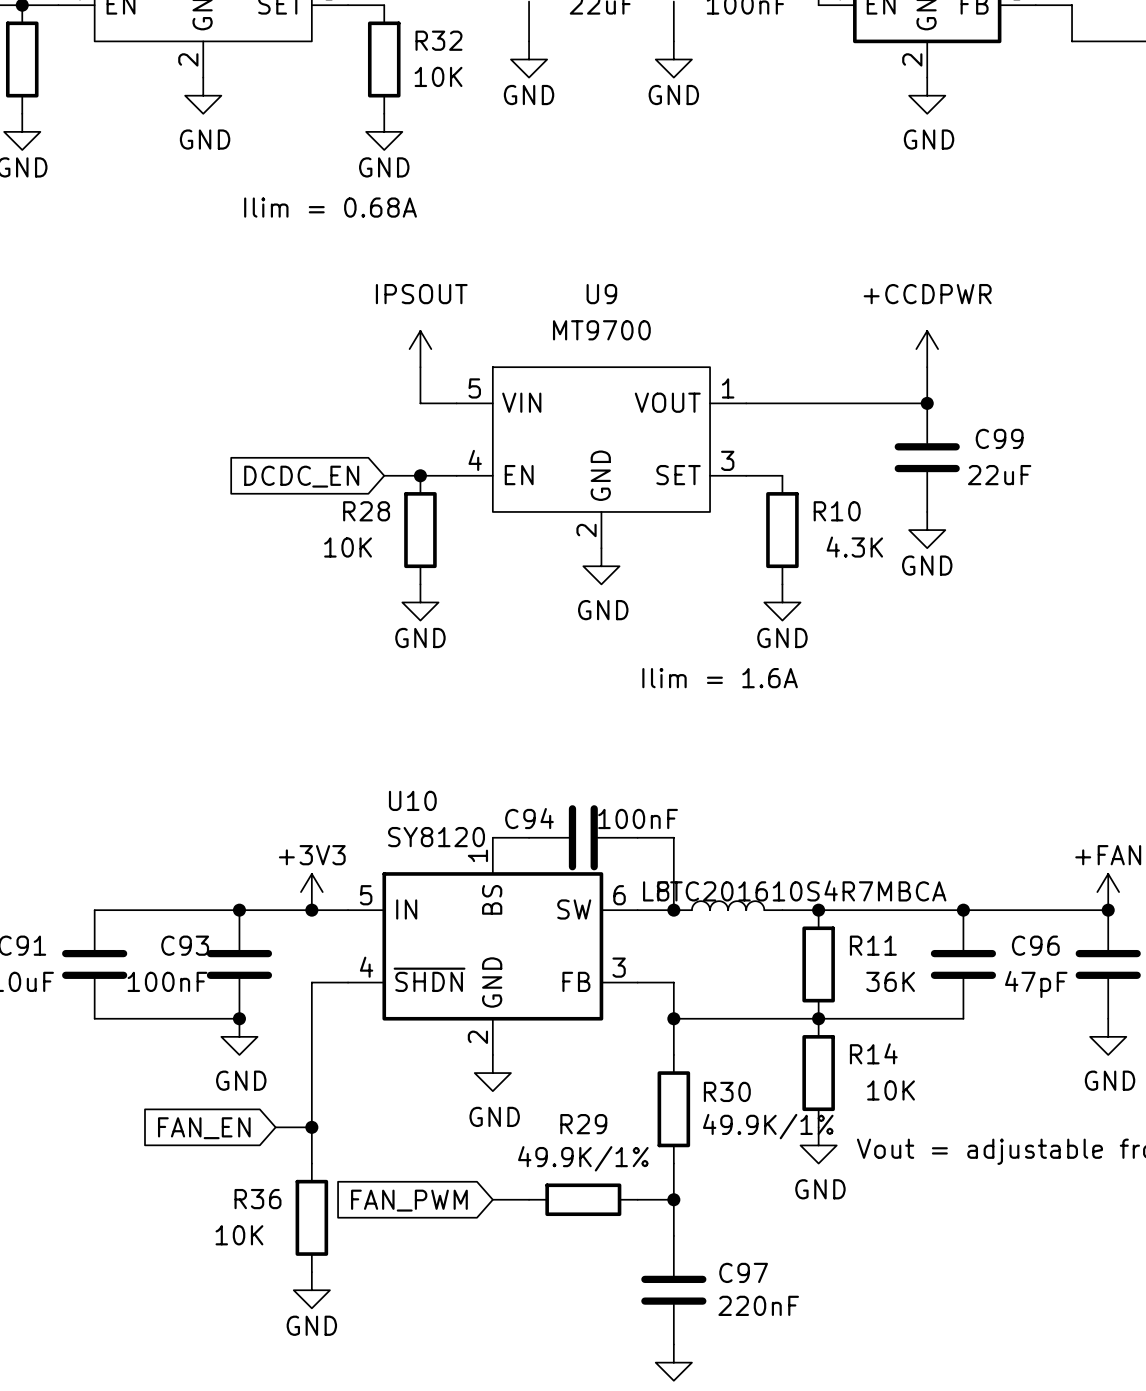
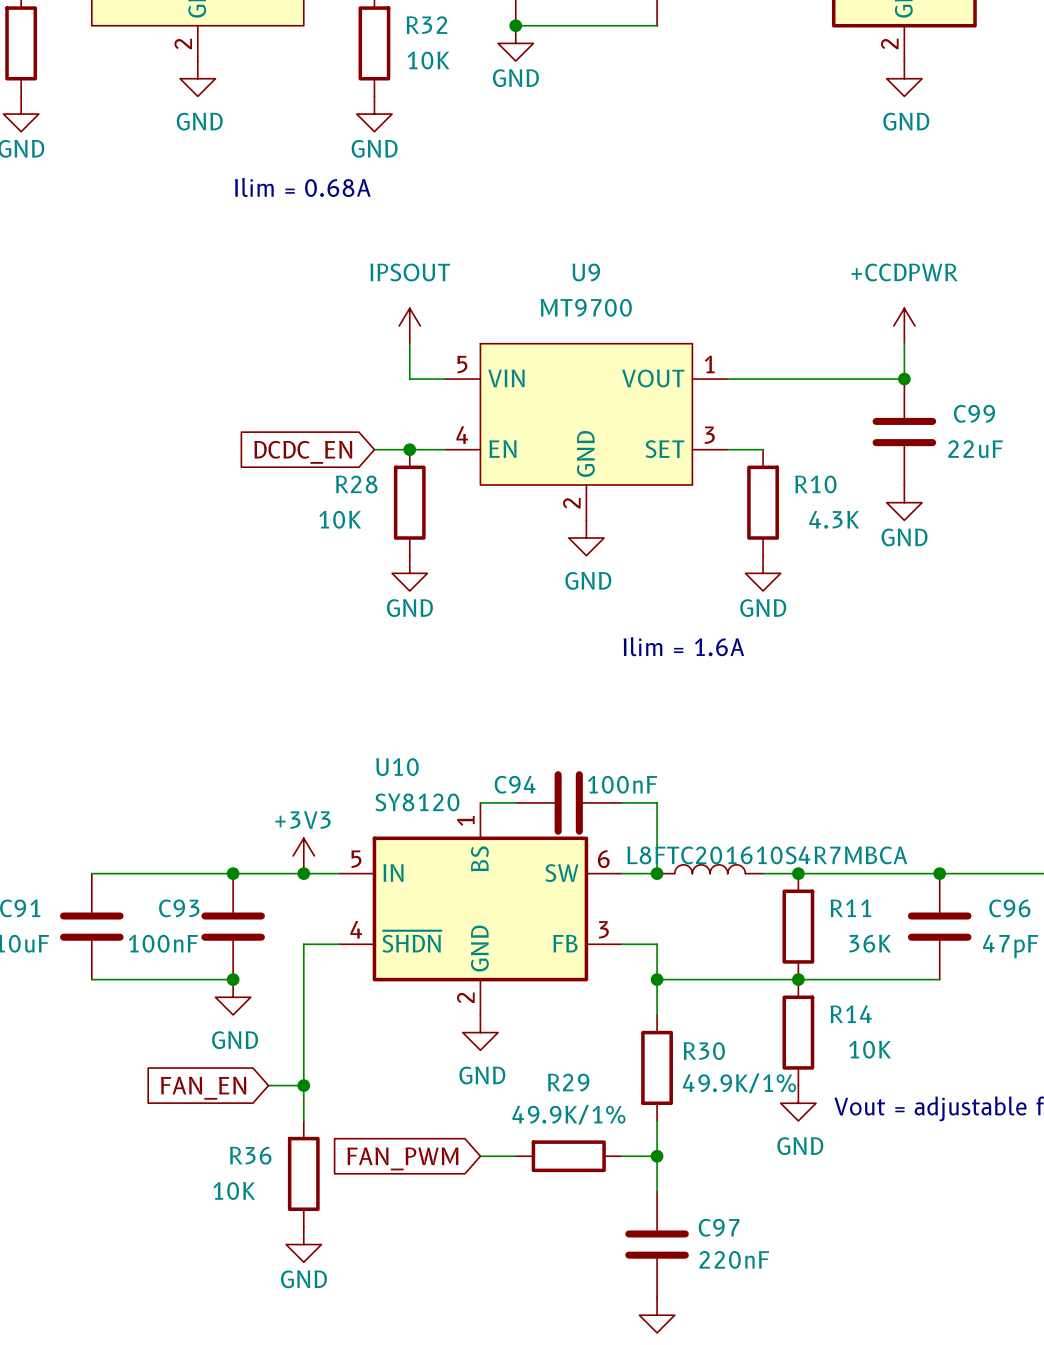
wire: none -> (515, 25) (657, 25)
junction: none -> (515, 25)
power symbol: GND (673, 59) -> none

